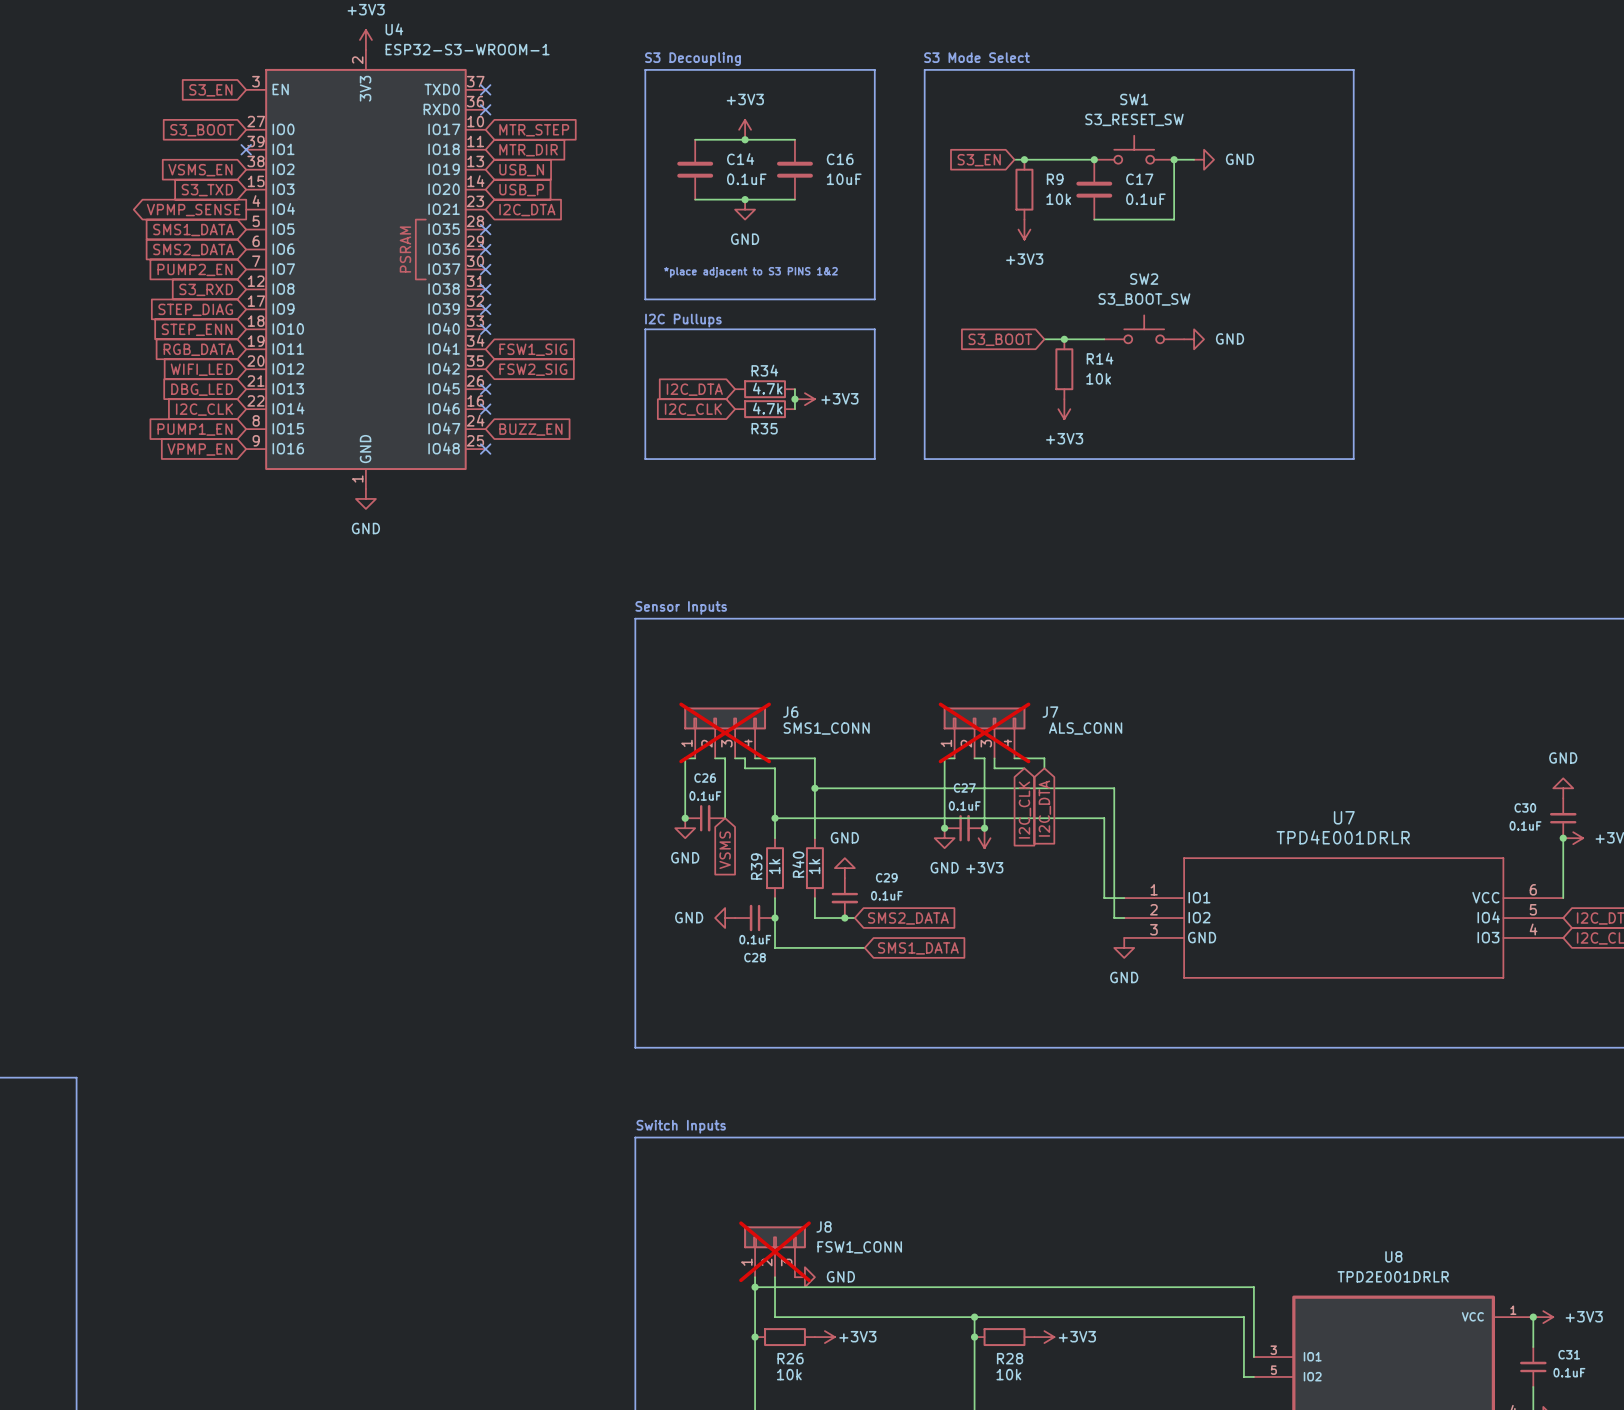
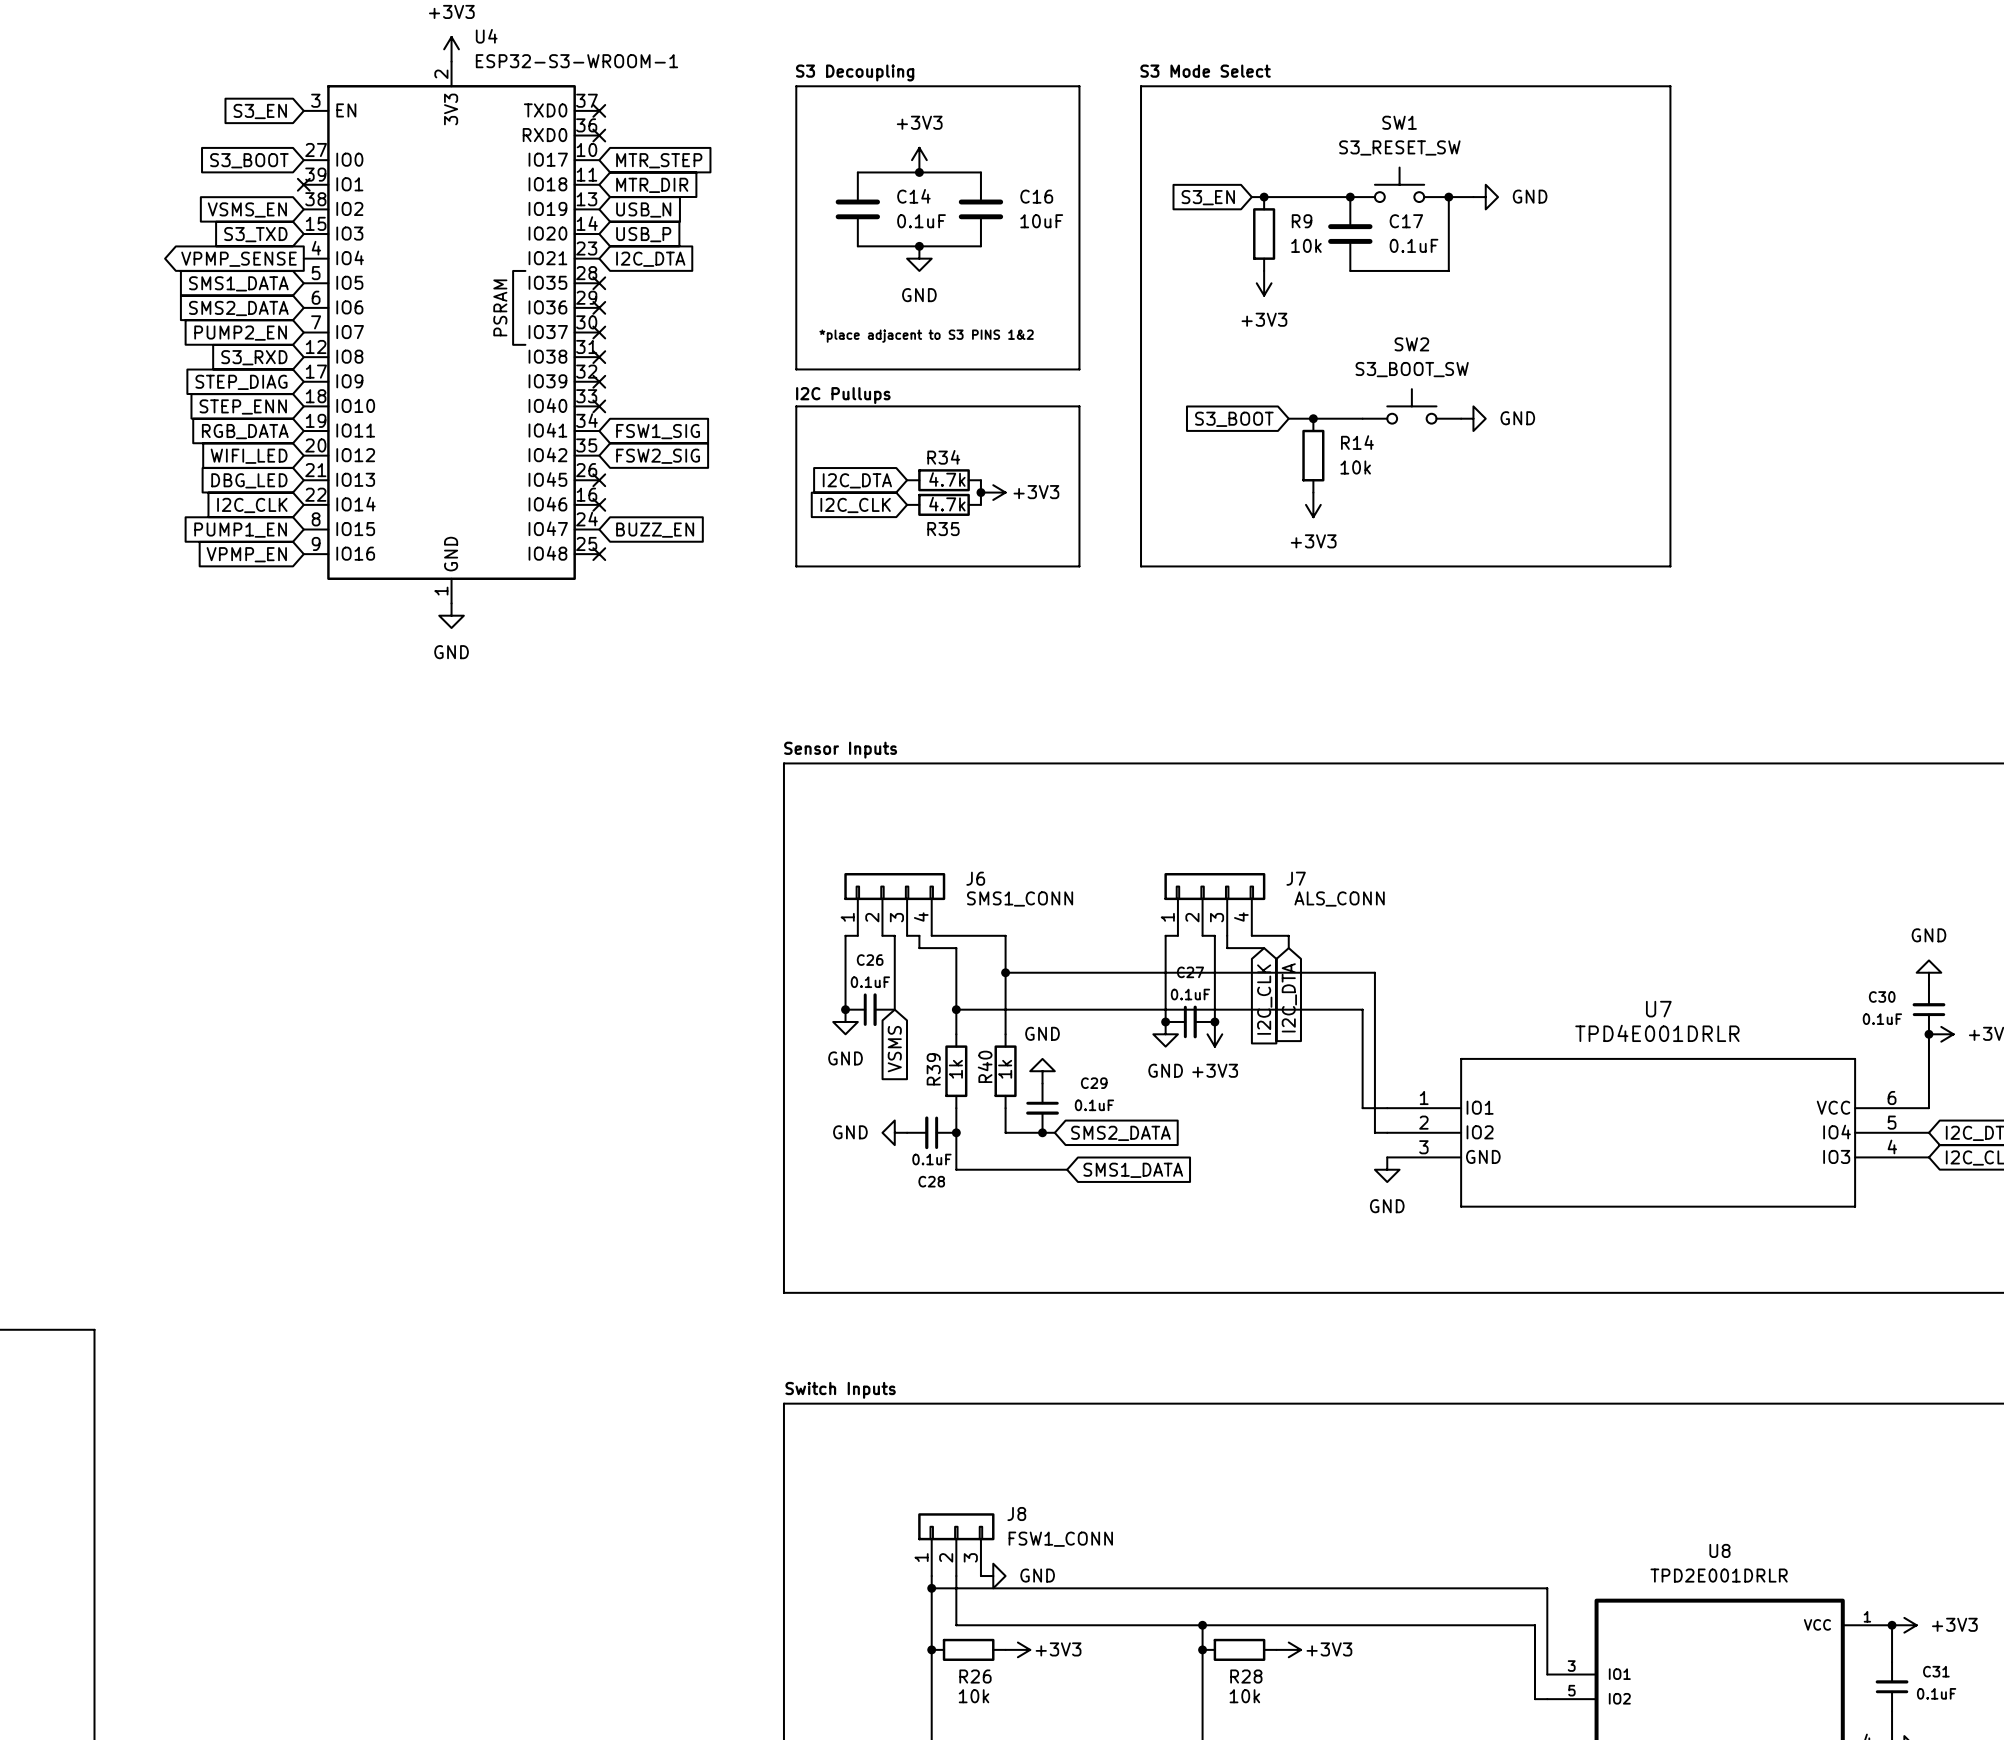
J6 do-not-place cross: (725, 732) -> none
J7 do-not-place cross: (984, 732) -> none
J8 do-not-place cross: (775, 1251) -> none

